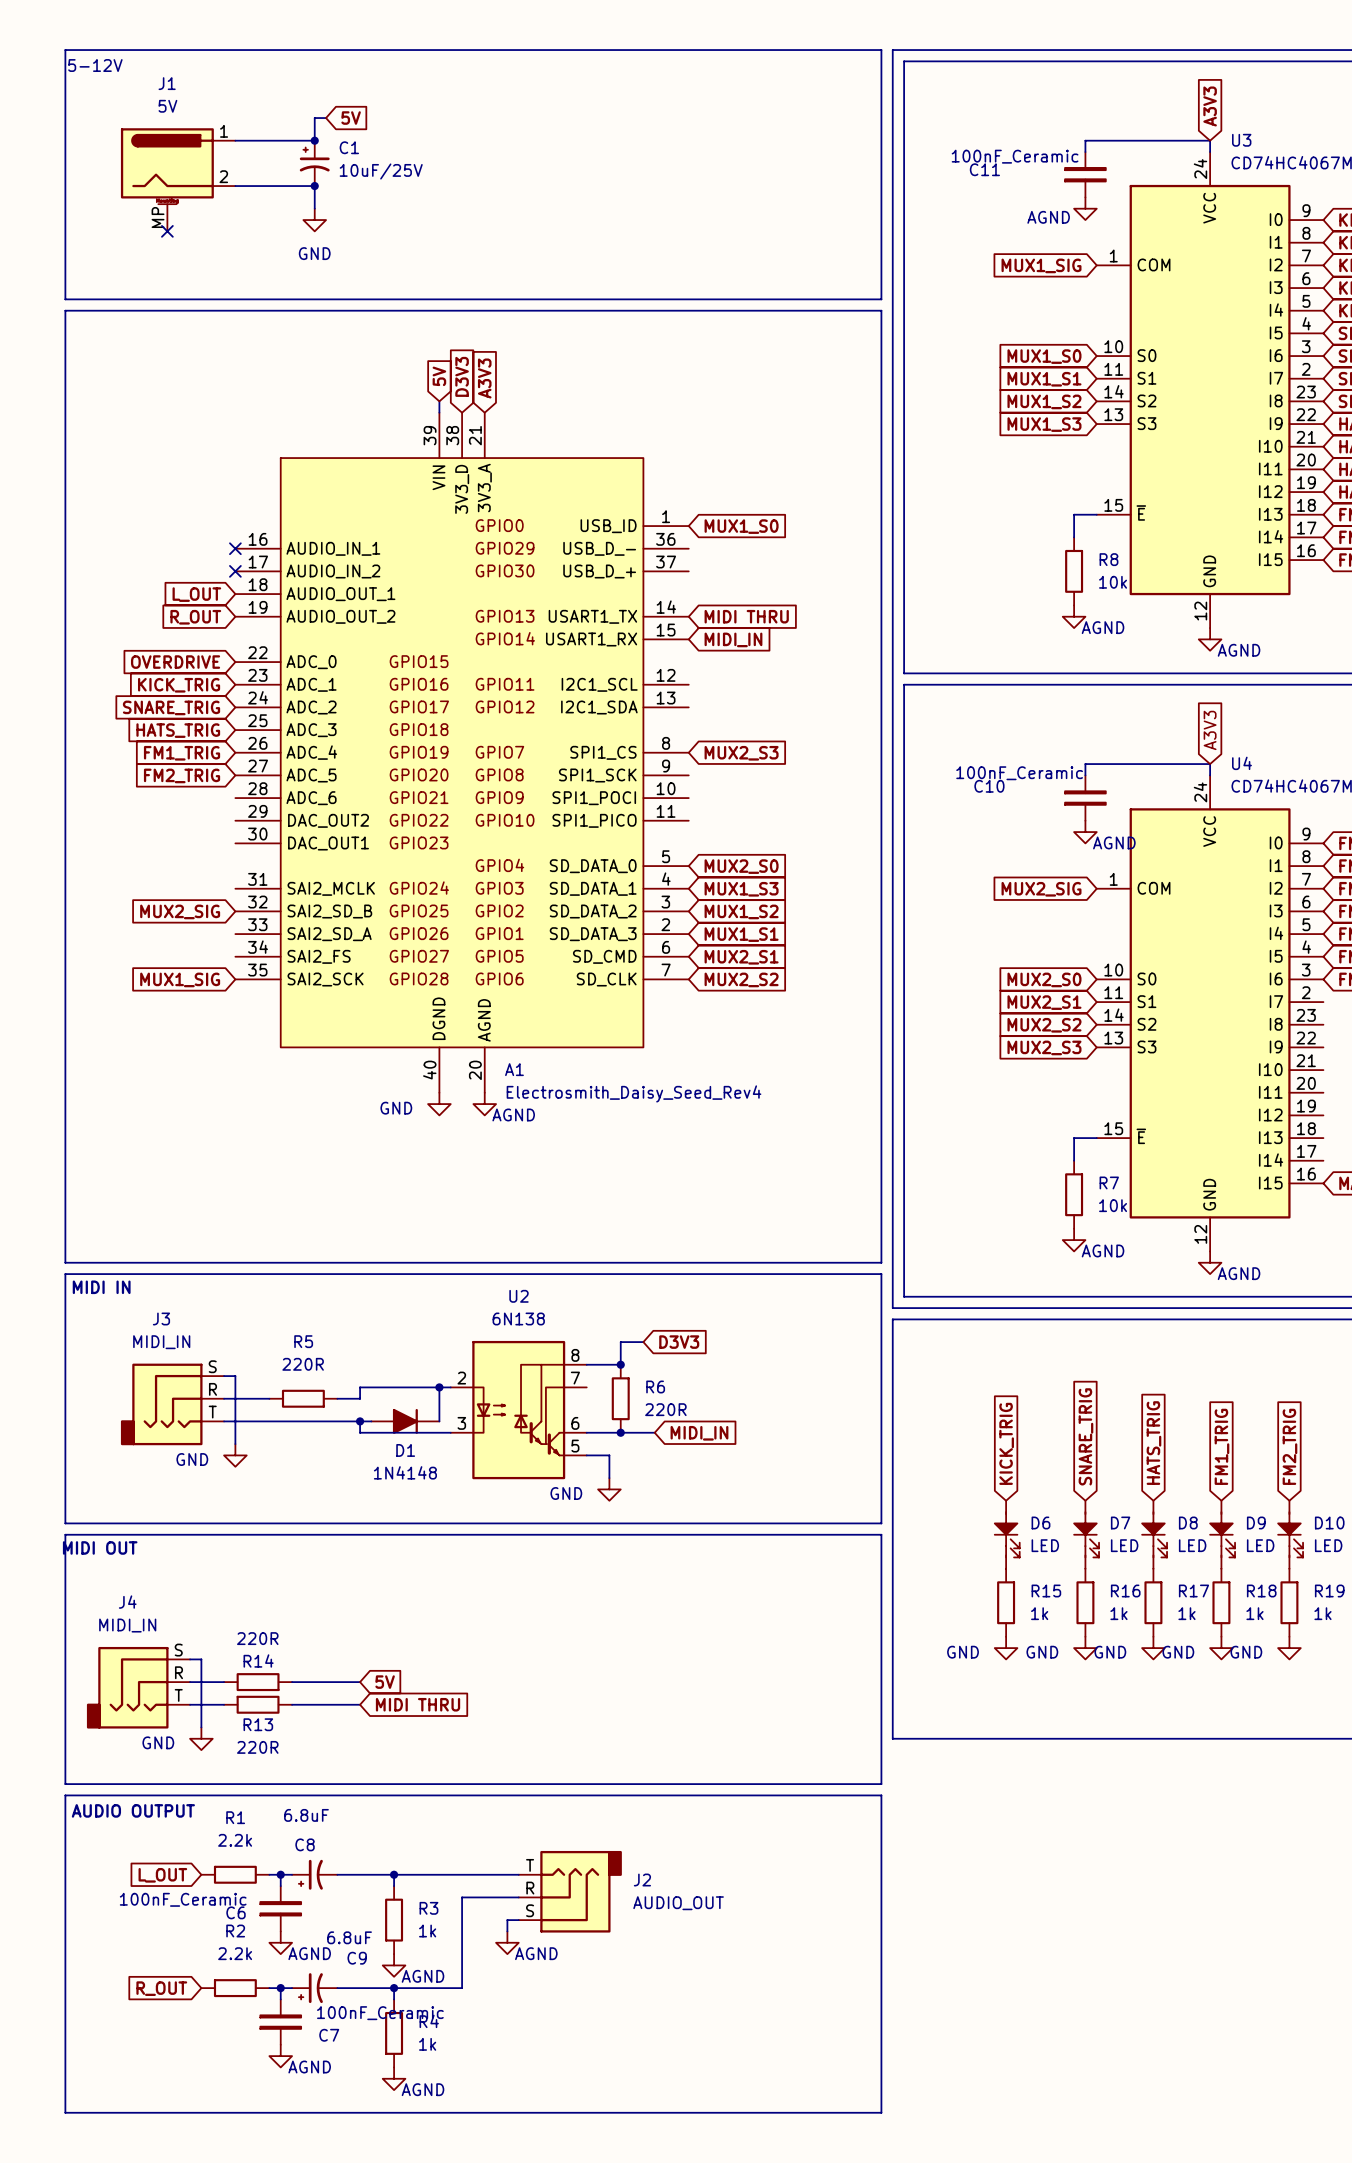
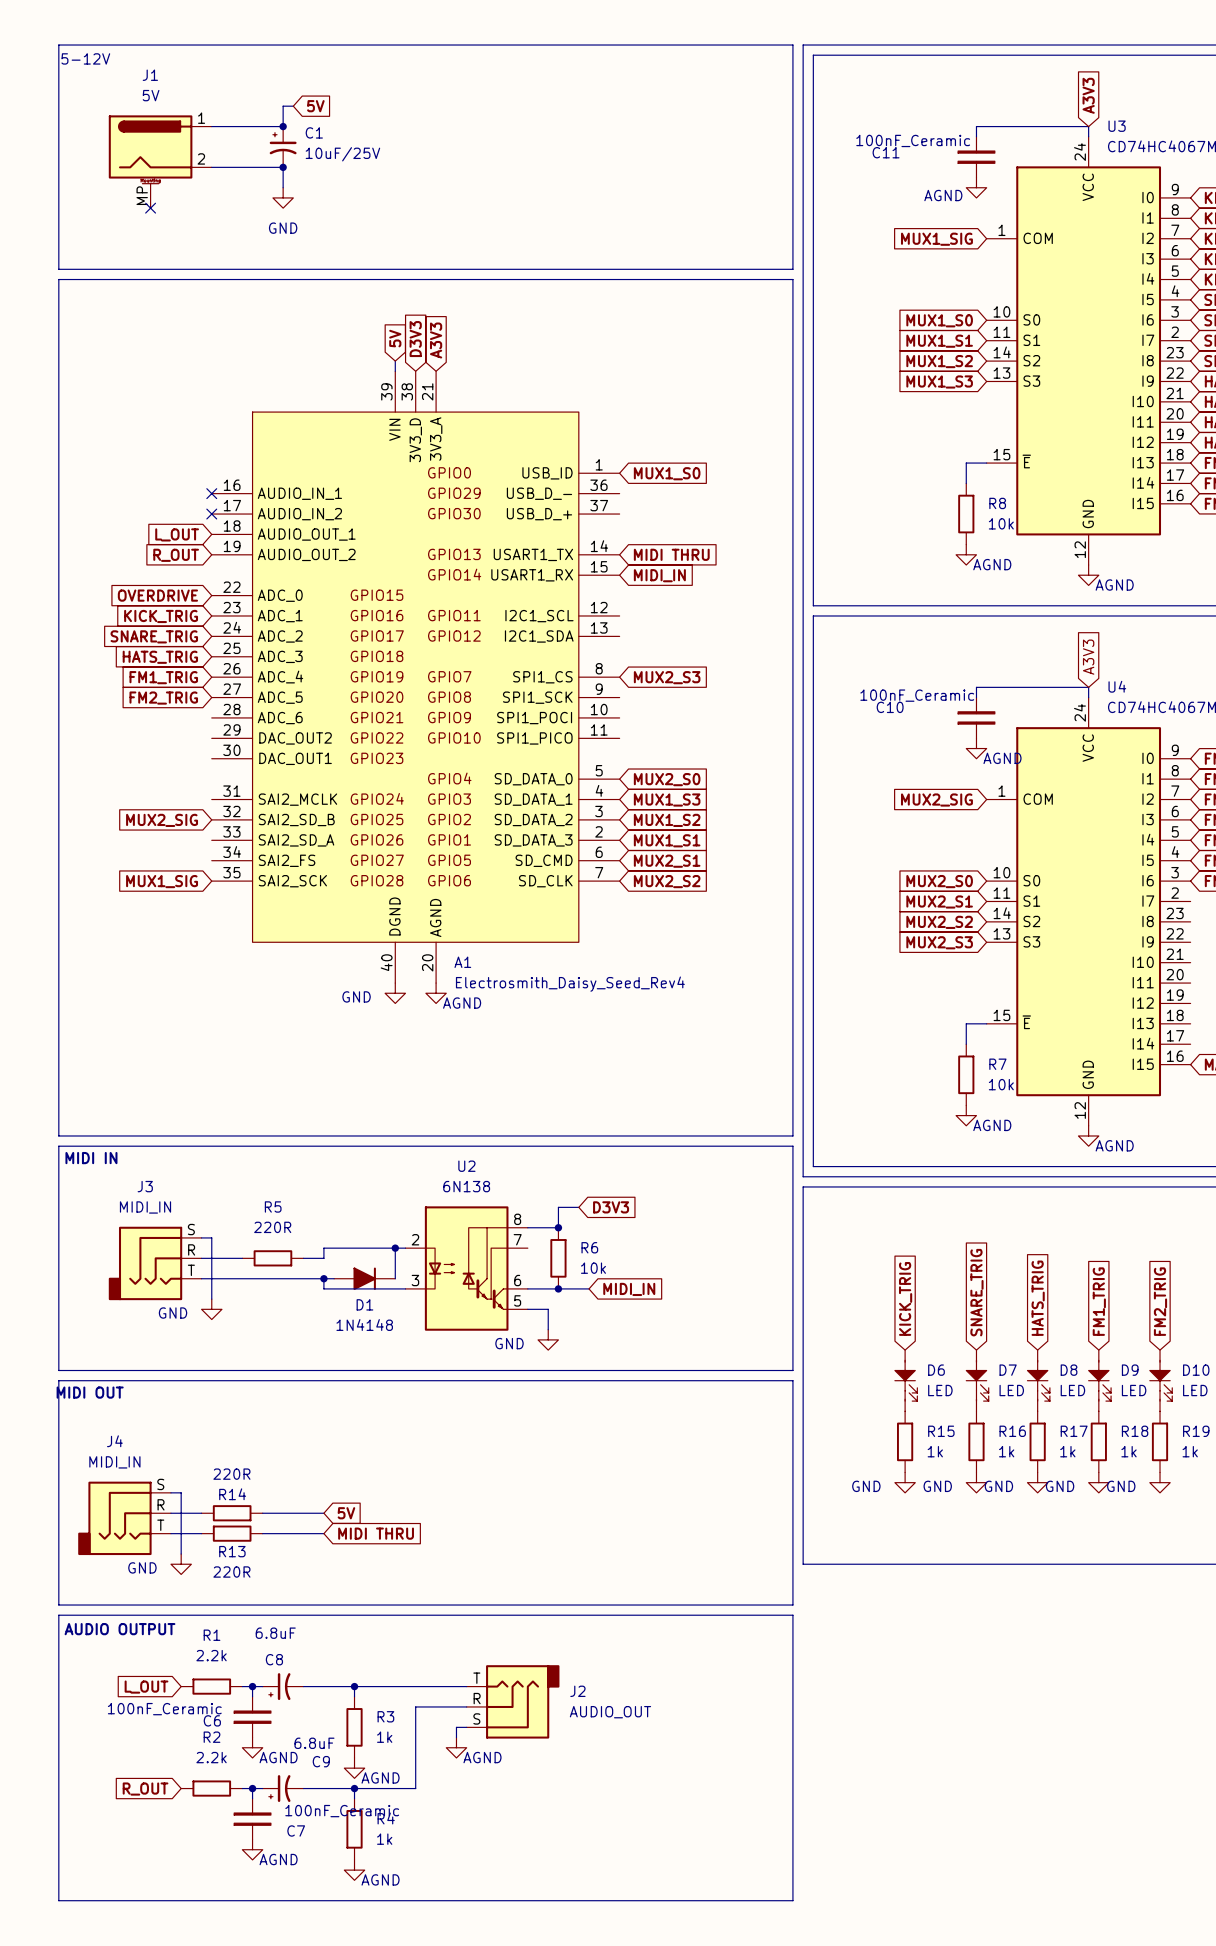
R6 value: 220R (665, 1409) -> 10k (593, 1268)

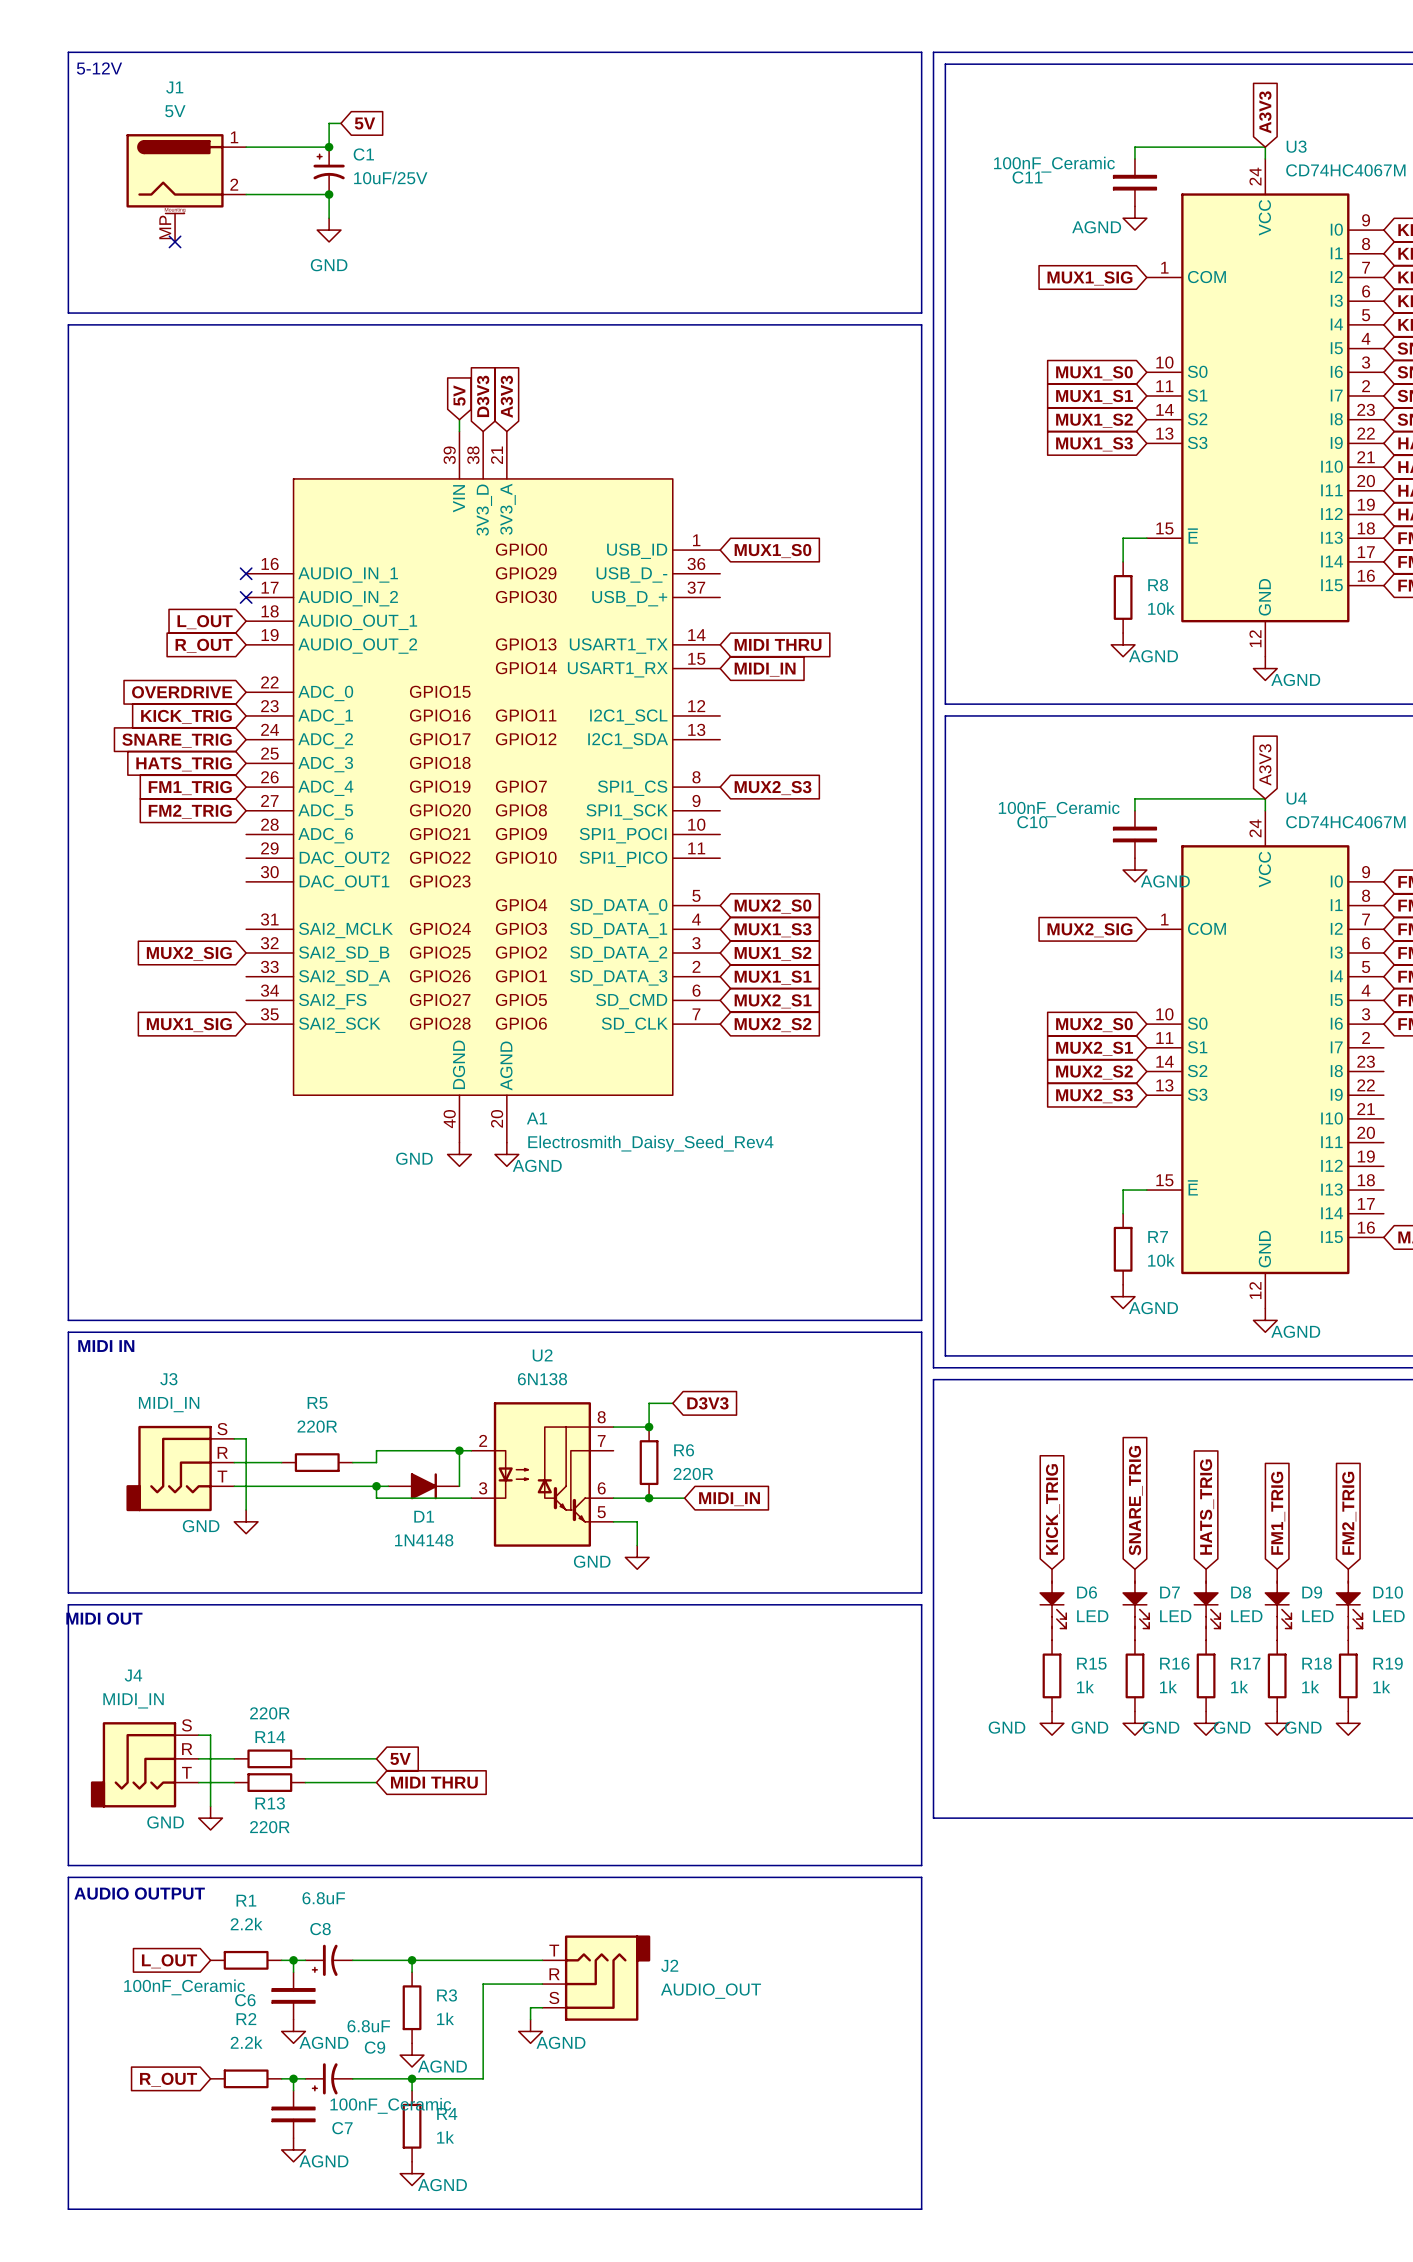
R6 value: 10k (593, 1268) -> 220R (693, 1474)

